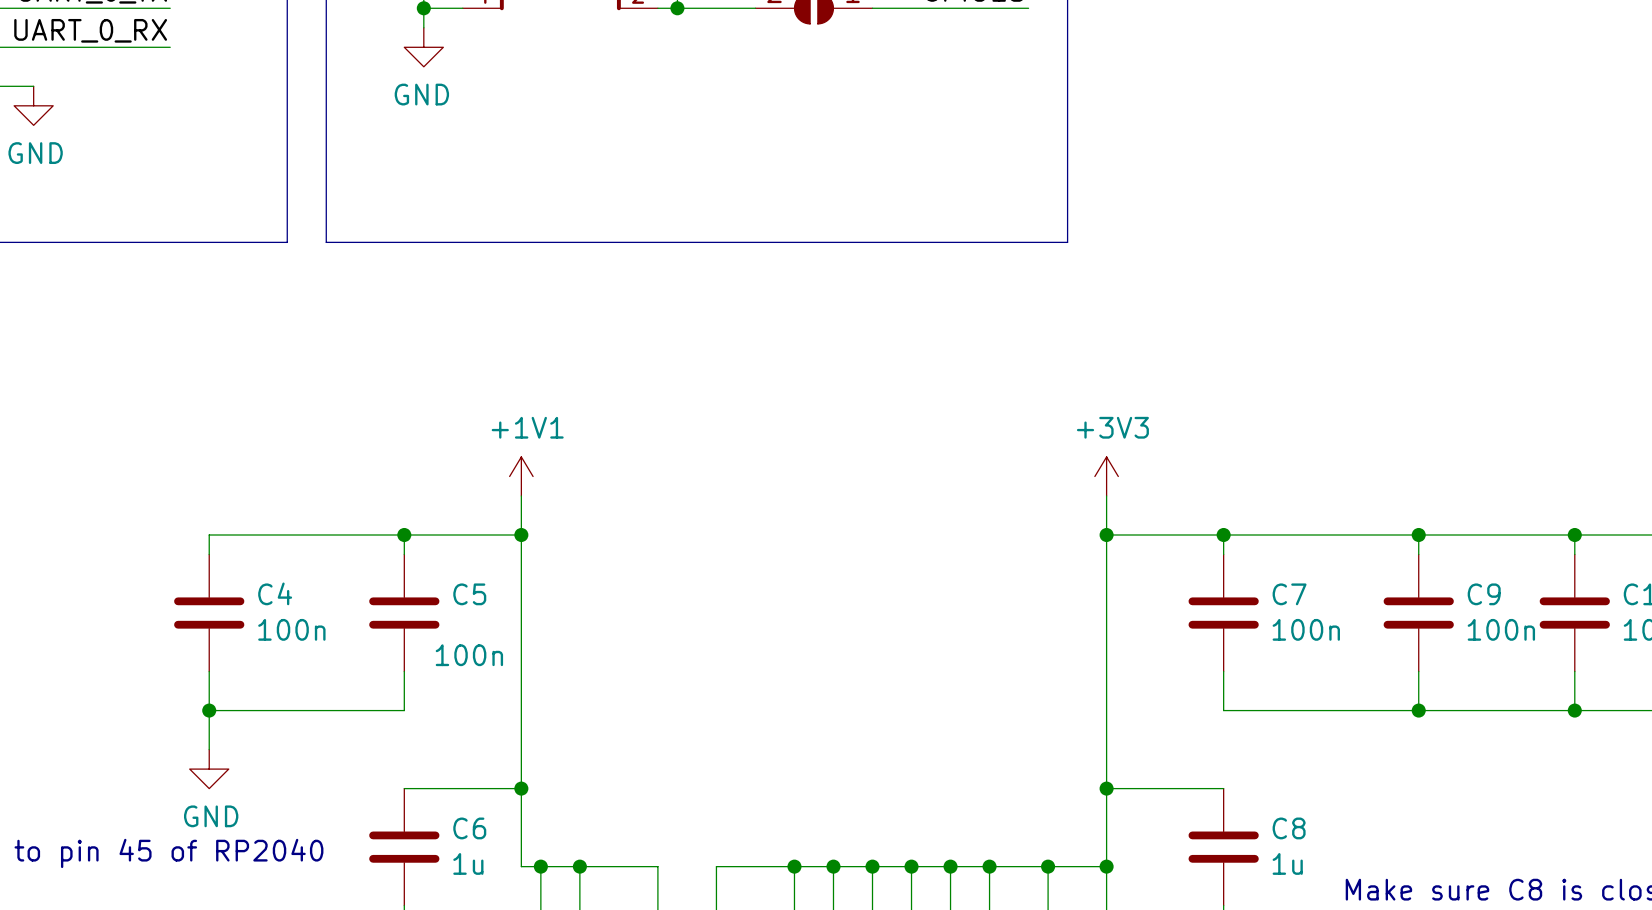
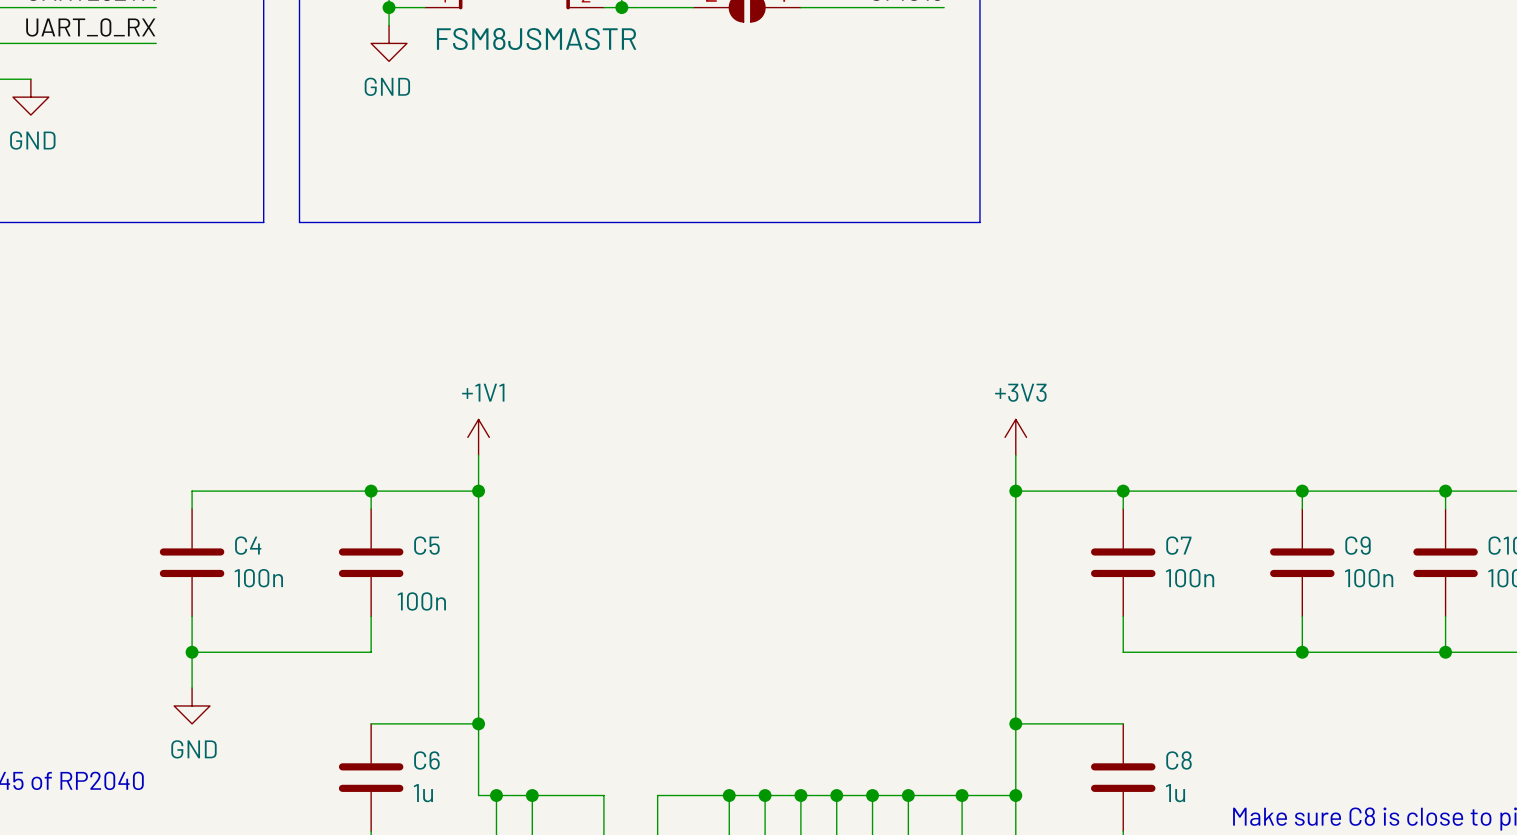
part value: none -> FSM8JSMASTR (536, 39)

